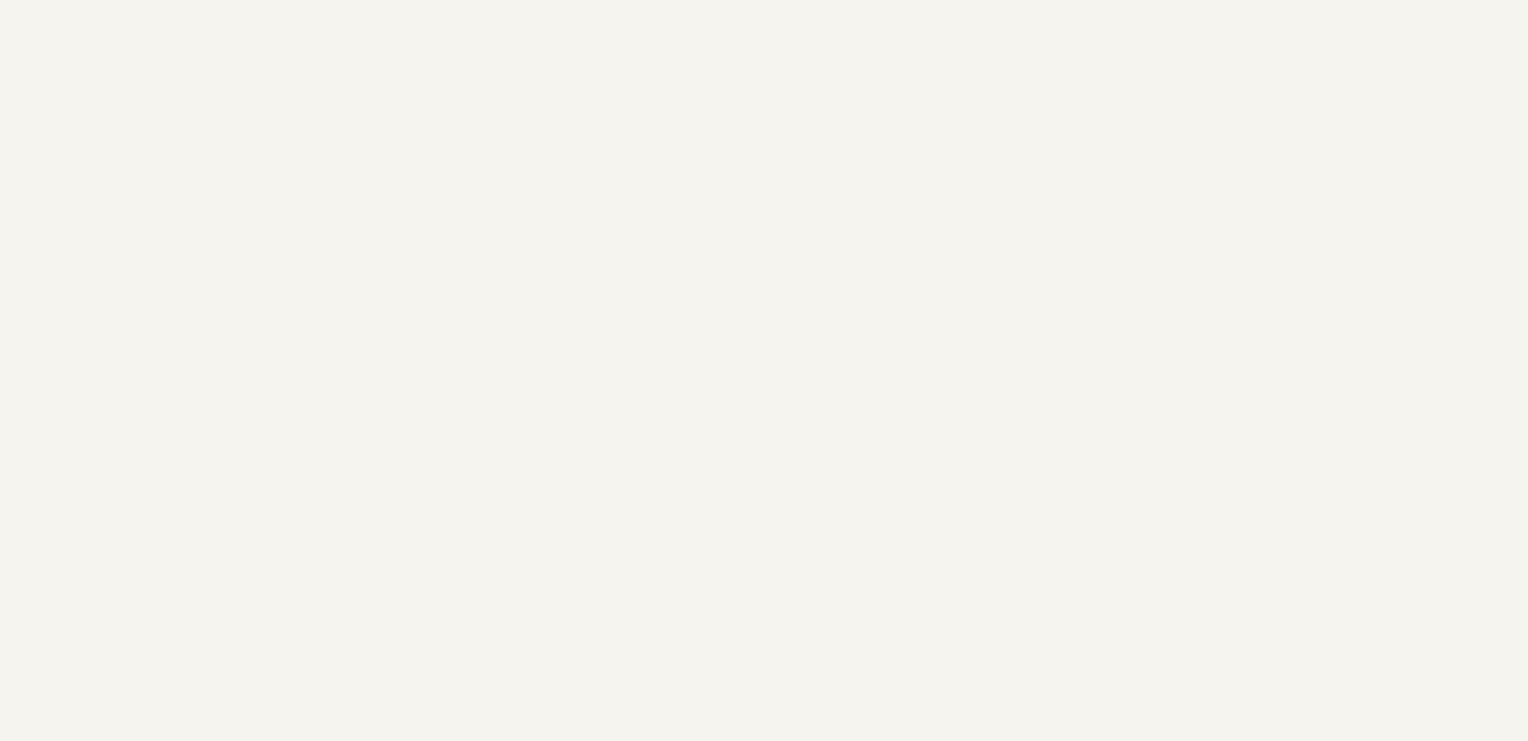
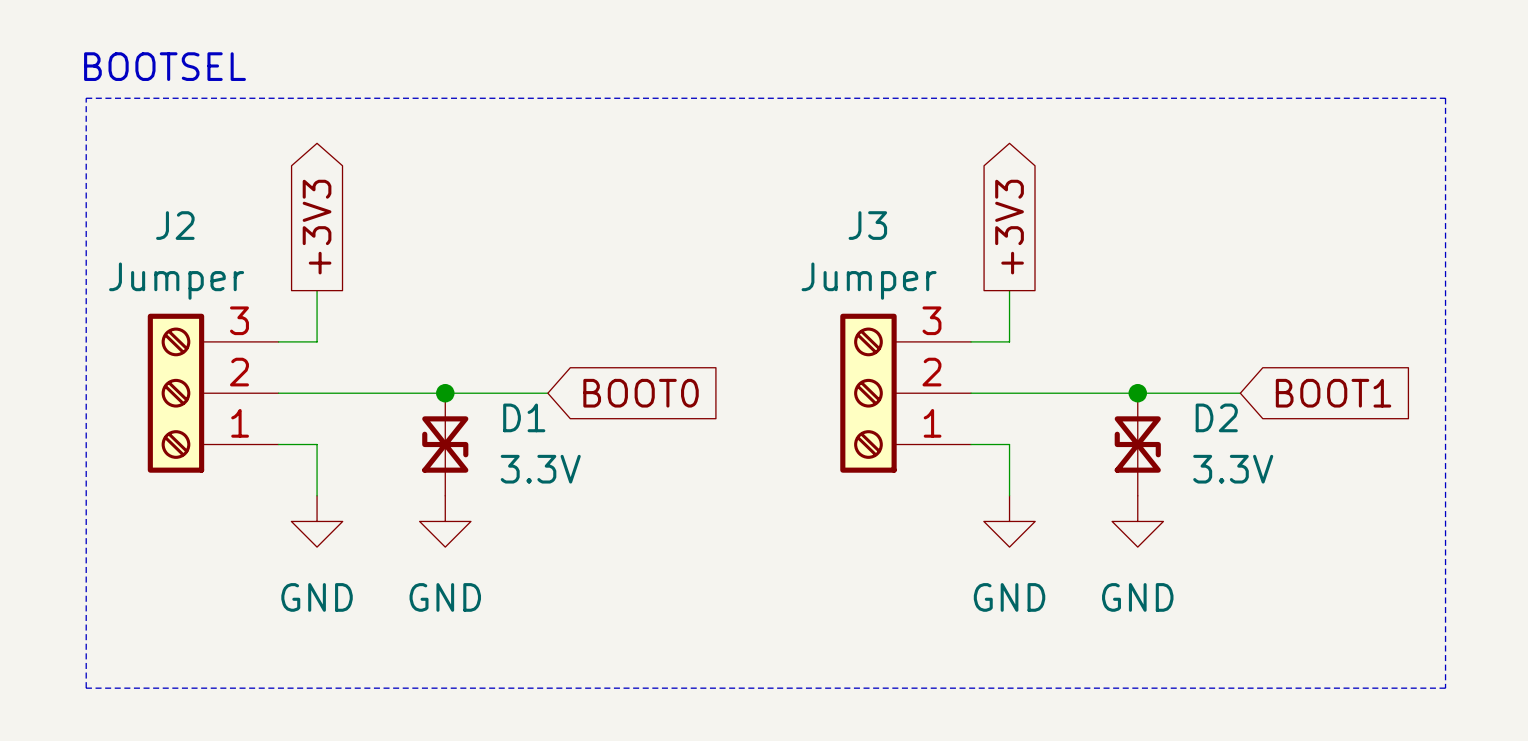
text: none -> BOOTSEL (164, 66)
line: none -> (86, 98) (1445, 98) (1445, 688) (86, 688) (86, 98)
global label: none -> +3V3 (317, 227)
global label: none -> +3V3 (1009, 227)
wire: none -> (317, 290) (317, 341) (278, 341)
wire: none -> (1009, 290) (1009, 341) (971, 341)
J2: none -> Jumper (213, 393)
wire: none -> (278, 393) (547, 393)
junction: none -> (445, 393)
global label: none -> BOOT0 (641, 393)
J3: none -> Jumper (905, 393)
wire: none -> (971, 393) (1240, 393)
junction: none -> (1137, 393)
global label: none -> BOOT1 (1333, 393)
wire: none -> (278, 444) (317, 444) (317, 495)
D1: none -> 3.3V (445, 444)
wire: none -> (971, 444) (1009, 444) (1009, 495)
D2: none -> 3.3V (1137, 444)
power symbol: none -> GND (317, 521)
power symbol: none -> GND (445, 521)
power symbol: none -> GND (1009, 521)
power symbol: none -> GND (1137, 521)

